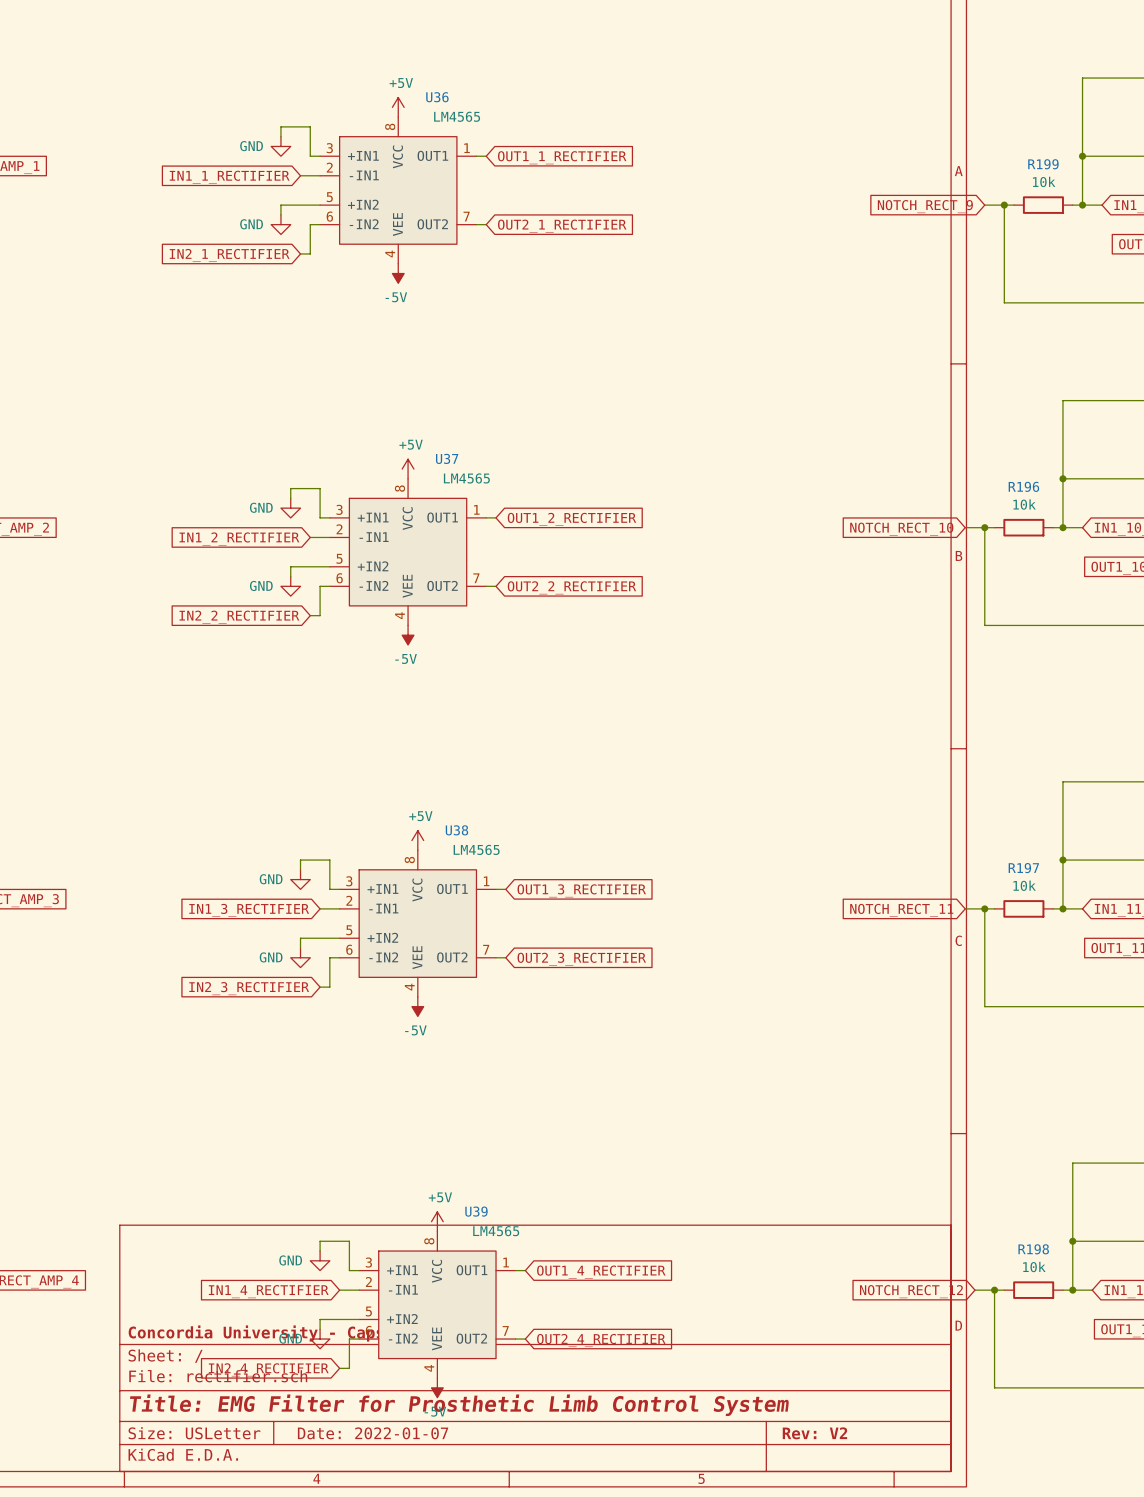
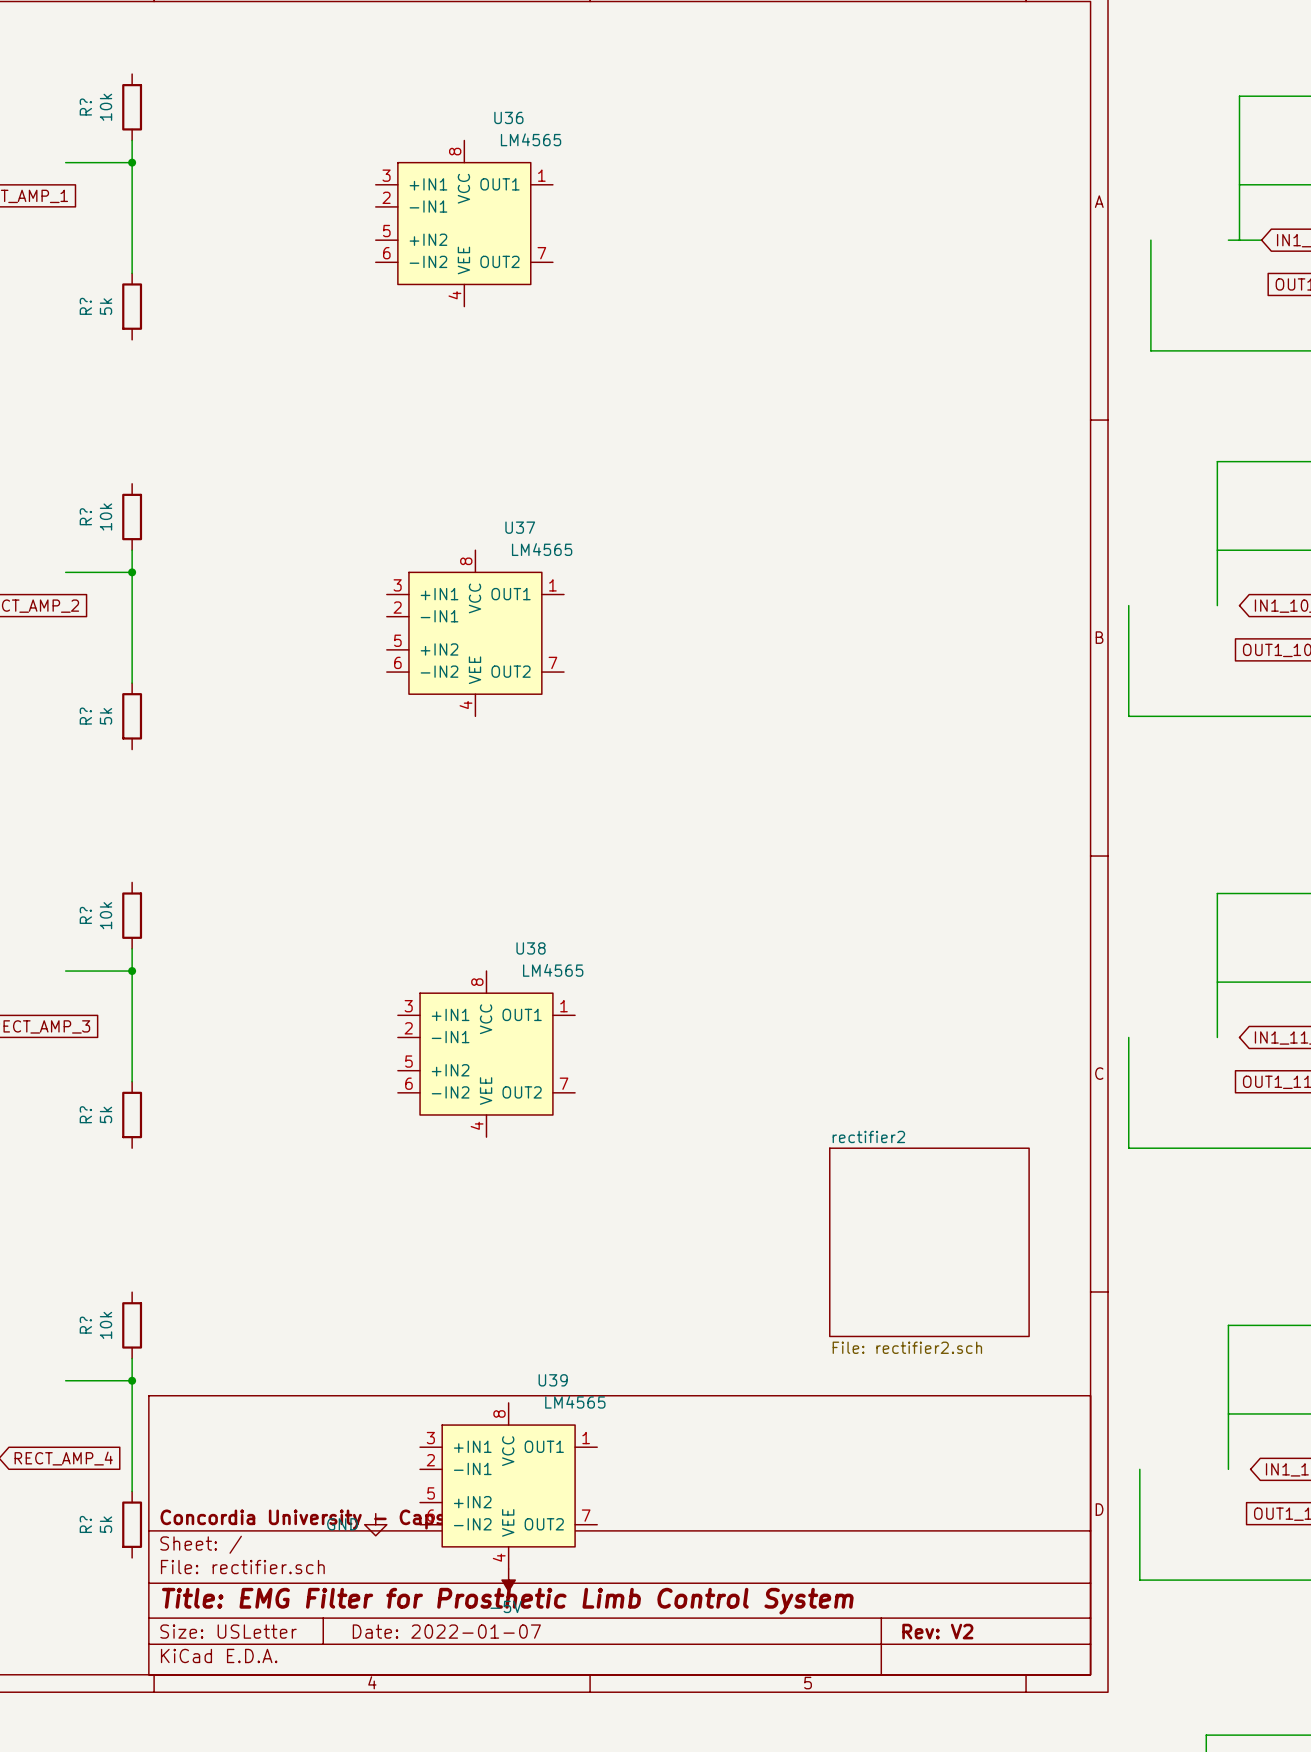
R?: none -> 10k (132, 107)
power symbol: +5V (398, 107) -> none
wire: none -> (132, 140) (132, 273)
wire: none -> (65, 162) (132, 162)
junction: none -> (132, 162)
wire: (280, 136) (280, 126) (310, 126) (310, 156) (320, 156) -> none
power symbol: GND (280, 146) -> none
wire: (476, 156) (486, 156) -> none
junction: (1082, 156) -> none
global label: OUT1_1_RECTIFIER (562, 157) -> none
wire: (300, 175) (320, 175) -> none
global label: IN1_1_RECTIFIER (229, 177) -> none
wire: (320, 205) (280, 205) (280, 214) -> none
wire: (984, 205) (1014, 205) -> none
junction: (1004, 205) -> none
R199: 10k (1043, 205) -> none
junction: (1082, 205) -> none
global label: NOTCH_RECT_9 (925, 206) -> none
power symbol: GND (280, 224) -> none
wire: (320, 224) (310, 224) (310, 253) (300, 253) -> none
wire: (476, 224) (486, 224) -> none
global label: OUT2_1_RECTIFIER (562, 226) -> none
global label: IN2_1_RECTIFIER (229, 255) -> none
R?: none -> 5k (132, 306)
power symbol: -5V (398, 273) -> none
R?: none -> 10k (132, 517)
power symbol: +5V (408, 469) -> none
wire: none -> (132, 550) (132, 683)
junction: (1062, 478) -> none
wire: none -> (65, 572) (132, 572)
junction: none -> (132, 572)
wire: (290, 498) (290, 488) (320, 488) (320, 517) (329, 517) -> none
power symbol: GND (290, 508) -> none
wire: (486, 517) (496, 517) -> none
global label: OUT1_2_RECTIFIER (571, 519) -> none
wire: (965, 527) (994, 527) -> none
junction: (984, 527) -> none
R196: 10k (1023, 527) -> none
wire: (1053, 527) (1082, 527) -> none
junction: (1062, 527) -> none
global label: NOTCH_RECT_10 (901, 529) -> none
wire: (310, 537) (329, 537) -> none
global label: IN1_2_RECTIFIER (239, 538) -> none
wire: (329, 566) (290, 566) (290, 576) -> none
power symbol: GND (290, 586) -> none
wire: (329, 586) (320, 586) (320, 615) (310, 615) -> none
wire: (486, 586) (496, 586) -> none
global label: OUT2_2_RECTIFIER (571, 587) -> none
global label: IN2_2_RECTIFIER (239, 617) -> none
R?: none -> 5k (132, 716)
power symbol: -5V (408, 635) -> none
R?: none -> 10k (132, 915)
wire: none -> (132, 948) (132, 1081)
power symbol: +5V (417, 840) -> none
wire: none -> (65, 971) (132, 971)
junction: none -> (132, 971)
junction: (1062, 860) -> none
wire: (300, 869) (300, 860) (329, 860) (329, 889) (339, 889) -> none
power symbol: GND (300, 879) -> none
wire: (496, 889) (505, 889) -> none
global label: OUT1_3_RECTIFIER (581, 890) -> none
wire: (320, 908) (339, 908) -> none
wire: (965, 908) (994, 908) -> none
junction: (984, 908) -> none
R197: 10k (1023, 908) -> none
wire: (1053, 908) (1082, 908) -> none
junction: (1062, 908) -> none
global label: IN1_3_RECTIFIER (249, 910) -> none
global label: NOTCH_RECT_11 (901, 910) -> none
wire: (339, 938) (300, 938) (300, 948) -> none
power symbol: GND (300, 957) -> none
wire: (339, 957) (329, 957) (329, 987) (320, 987) -> none
wire: (496, 957) (505, 957) -> none
global label: OUT2_3_RECTIFIER (581, 959) -> none
R?: none -> 5k (132, 1114)
global label: IN2_3_RECTIFIER (249, 988) -> none
power symbol: -5V (417, 1006) -> none
sheet rectifier2: none -> File: rectifier2.sch (929, 1242)
R?: none -> 10k (132, 1325)
wire: none -> (132, 1358) (132, 1491)
wire: none -> (65, 1380) (132, 1380)
junction: none -> (132, 1380)
power symbol: +5V (437, 1221) -> none
junction: (1072, 1241) -> none
wire: (320, 1251) (320, 1241) (349, 1241) (349, 1270) (359, 1270) -> none
power symbol: GND (320, 1260) -> none
wire: (515, 1270) (525, 1270) -> none
global label: OUT1_4_RECTIFIER (601, 1272) -> none
wire: (339, 1290) (359, 1290) -> none
wire: (975, 1290) (1004, 1290) -> none
junction: (994, 1290) -> none
R198: 10k (1033, 1290) -> none
wire: (1062, 1290) (1092, 1290) -> none
junction: (1072, 1290) -> none
global label: IN1_4_RECTIFIER (268, 1291) -> none
global label: NOTCH_RECT_12 (911, 1291) -> none
wire: (359, 1319) (320, 1319) (320, 1329) -> none
R?: none -> 5k (132, 1524)
wire: (359, 1339) (349, 1339) (349, 1368) (339, 1368) -> none
wire: (515, 1339) (525, 1339) -> none
global label: OUT2_4_RECTIFIER (601, 1340) -> none
global label: IN2_4_RECTIFIER (268, 1369) -> none

